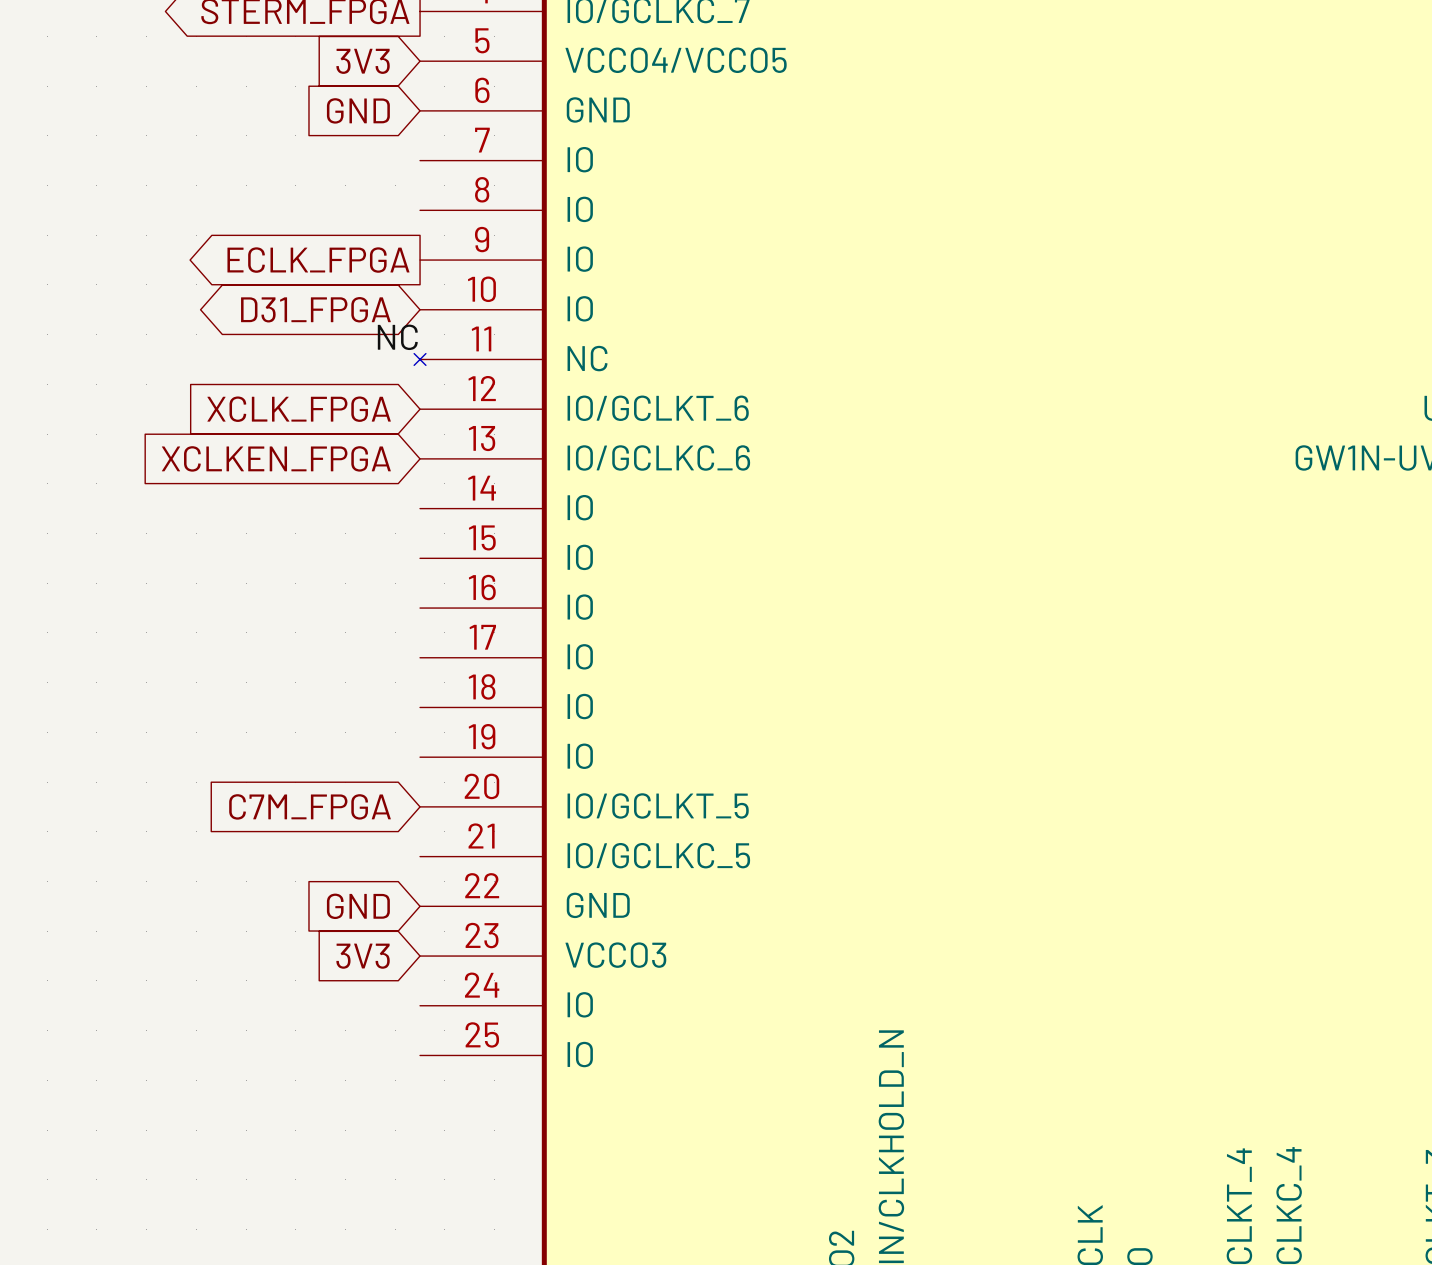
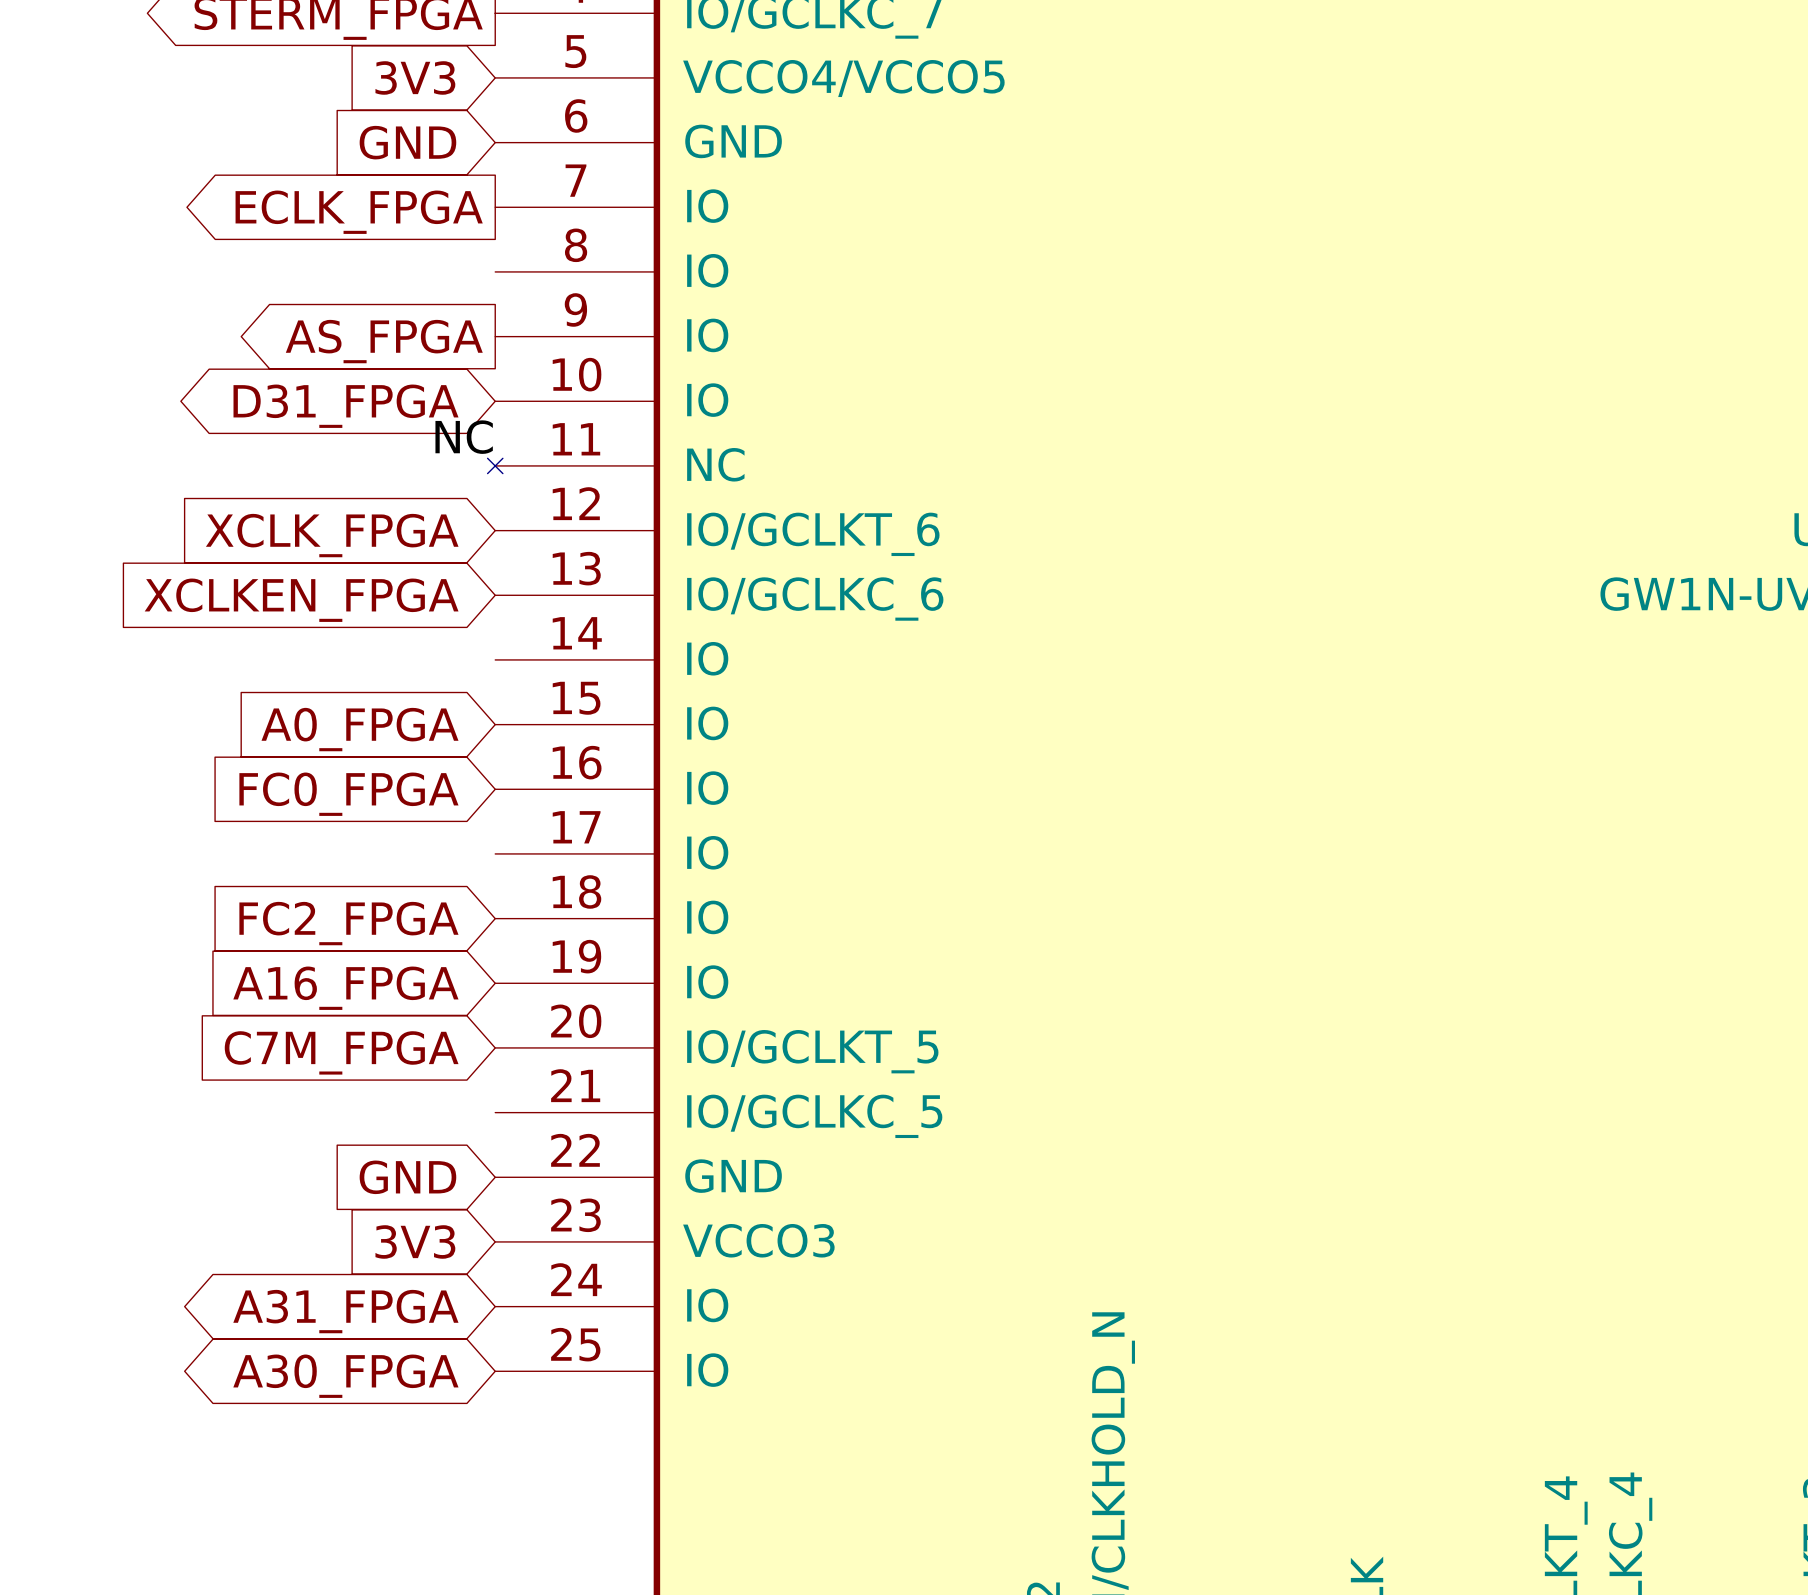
global label: none -> ECLK_FPGA (359, 212)
global label: ECLK_FPGA (318, 260) -> AS_FPGA (384, 341)
global label: none -> A0_FPGA (360, 729)
global label: none -> FC0_FPGA (348, 794)
global label: none -> FC2_FPGA (348, 923)
global label: none -> A16_FPGA (345, 988)
global label: none -> A31_FPGA (345, 1311)
global label: none -> A30_FPGA (345, 1376)

